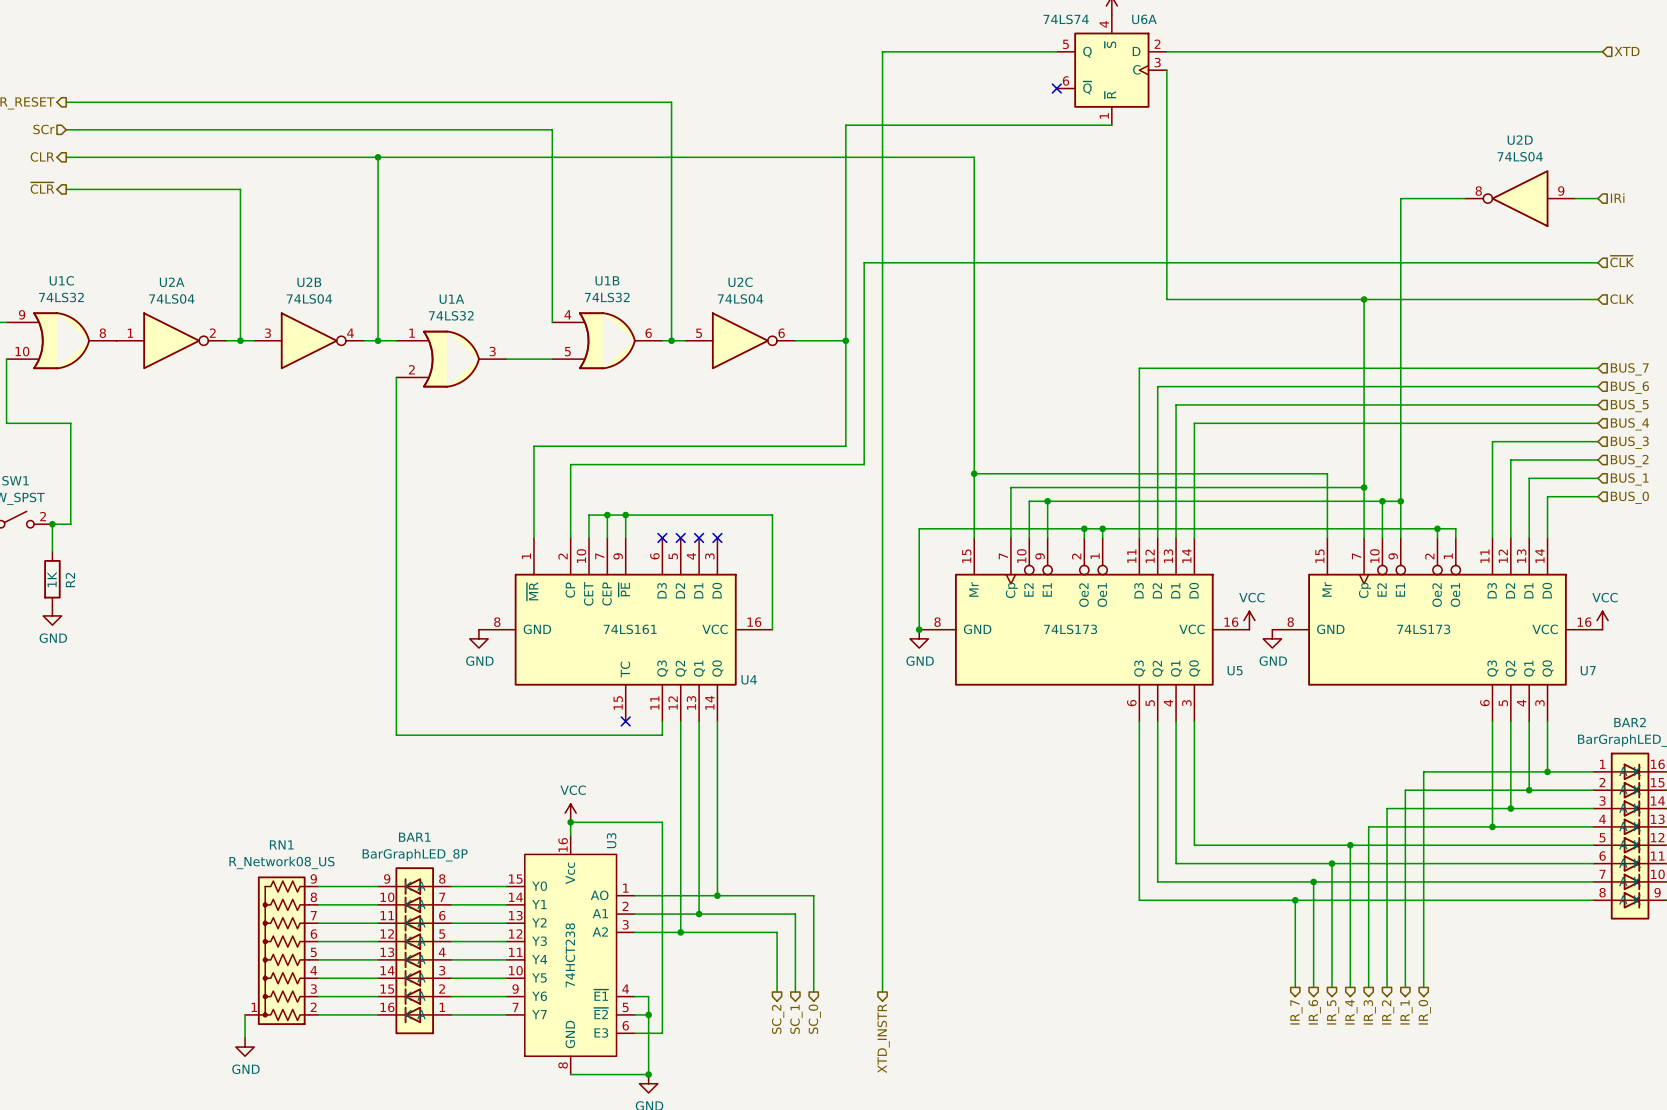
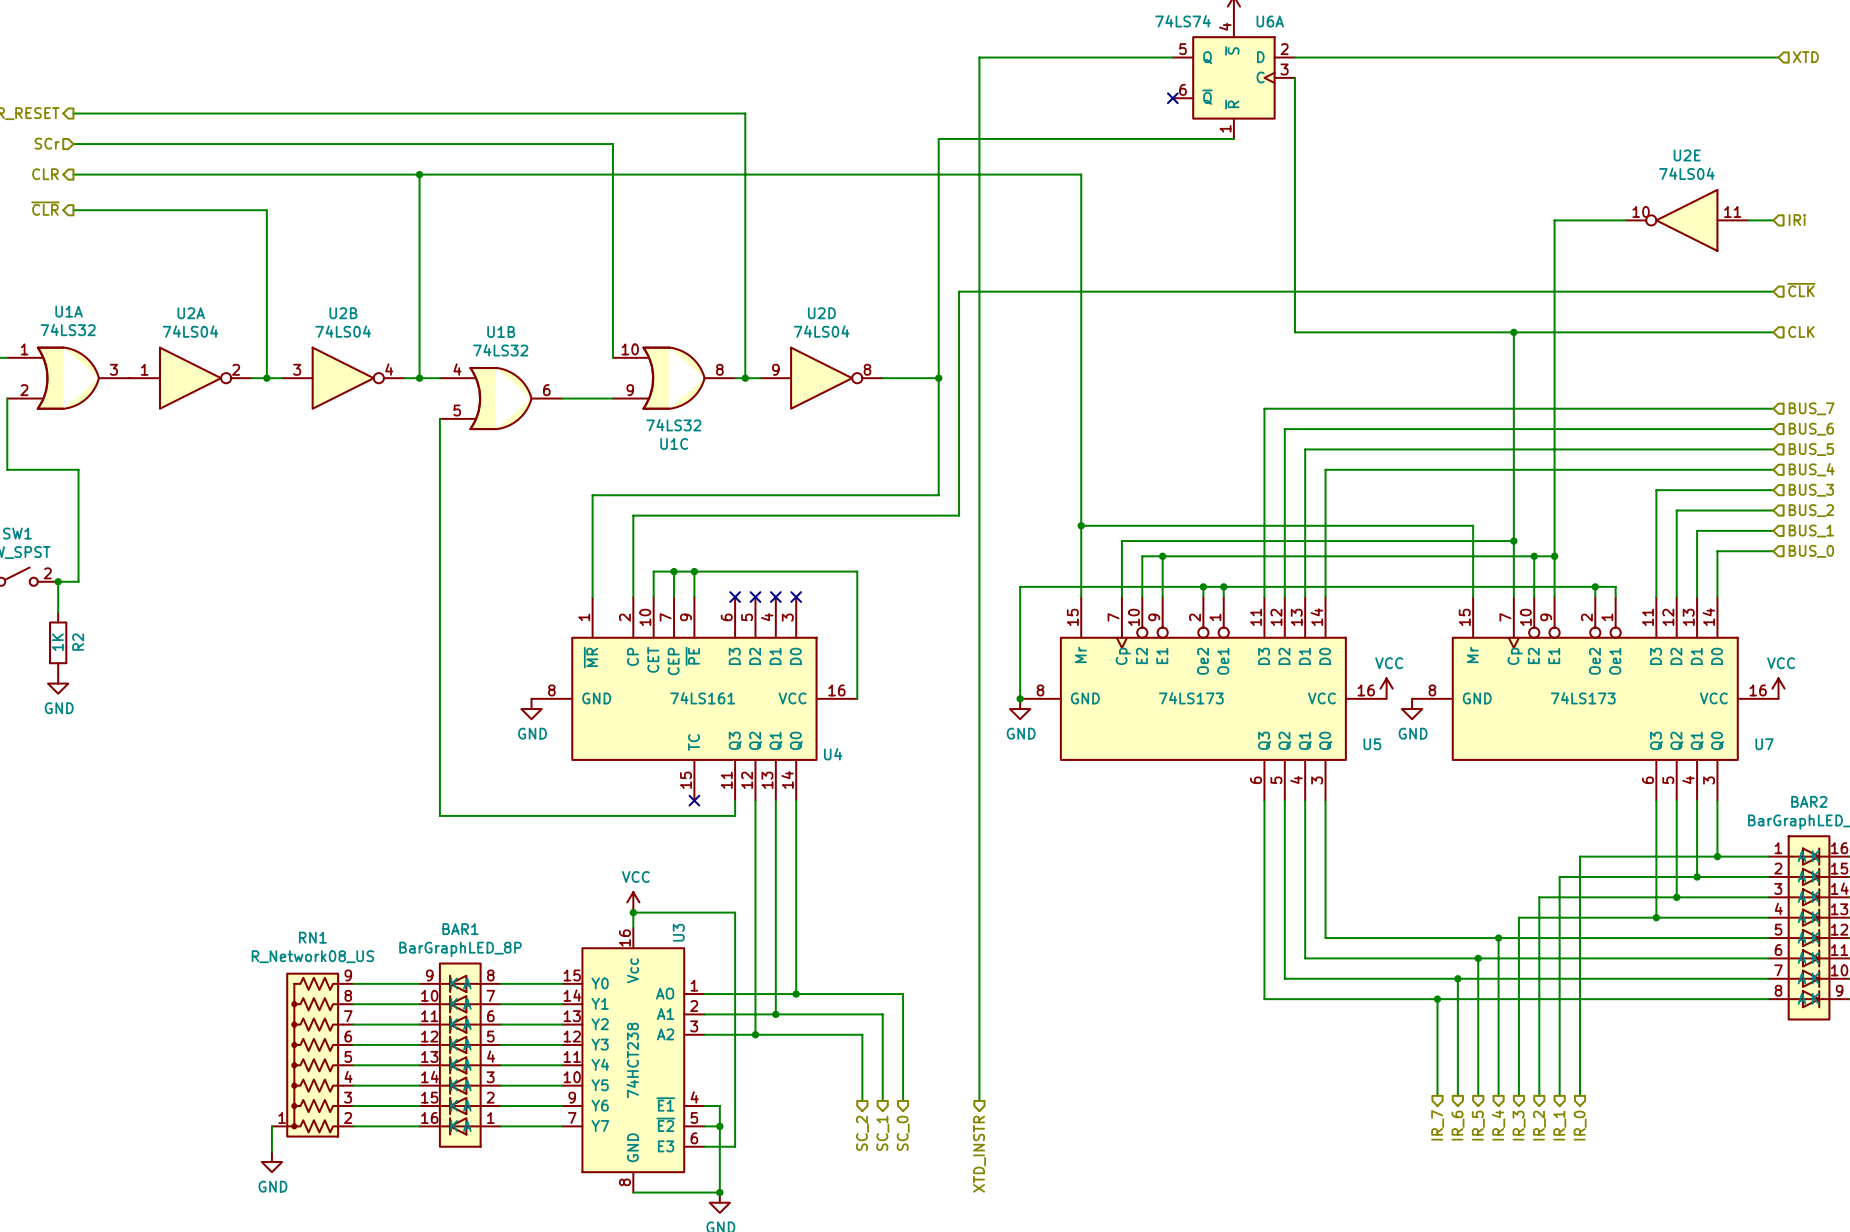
U2D rotation: 0° (1520, 198) -> 180° (821, 378)
U2D position: (1520, 198) -> (821, 378)
U2E: none -> 74LS04 (1686, 220)
U1C flip: as is (61, 340) -> up-down (674, 378)
U1C position: (61, 340) -> (674, 378)
U1B position: (607, 340) -> (500, 398)
U2C: 74LS04 (740, 340) -> none
U1A position: (451, 359) -> (68, 378)

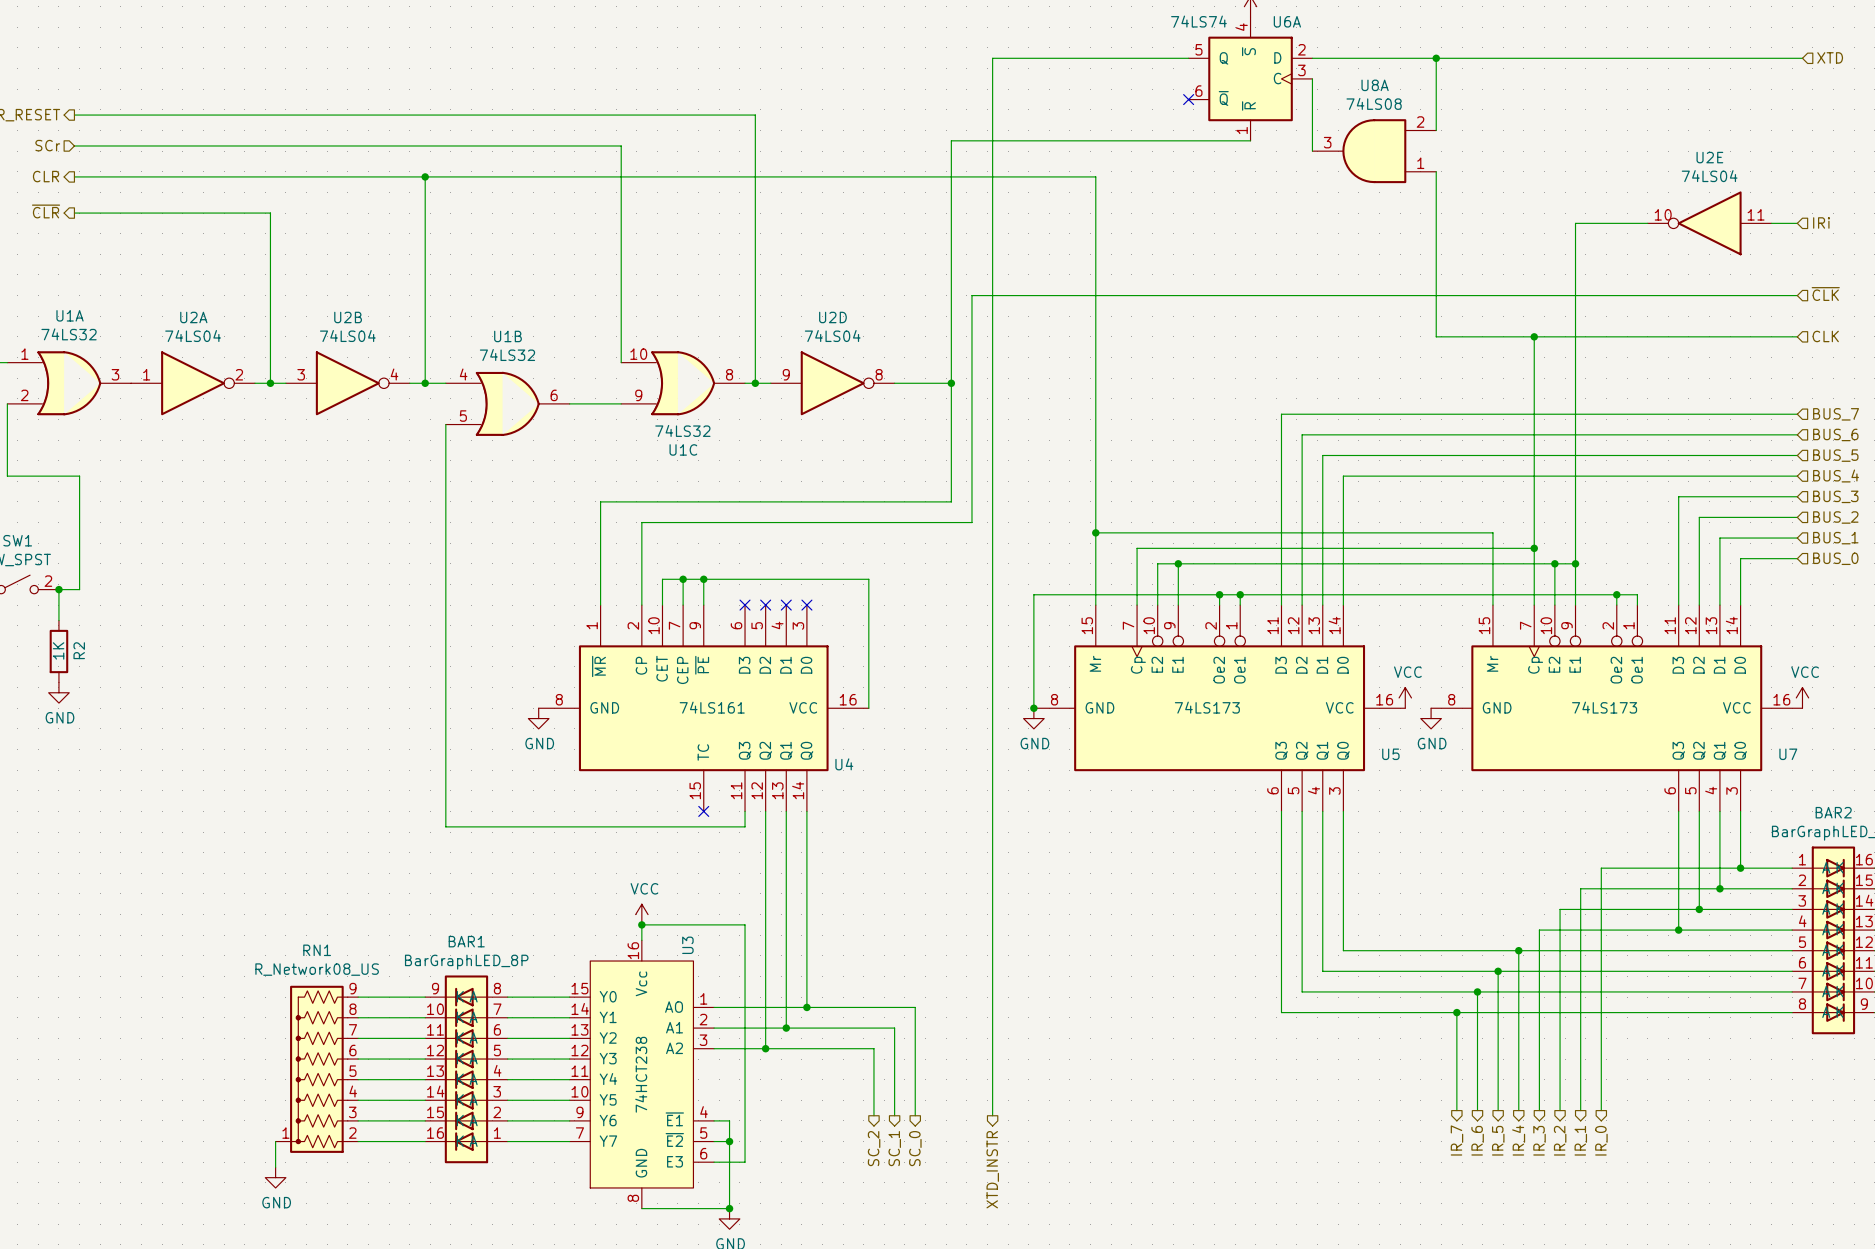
wire: none -> (1436, 58) (1436, 130)
junction: none -> (1436, 58)
wire: (1294, 149) (1294, 332) (1417, 332) -> (1436, 171) (1436, 336)
U8A: none -> 74LS08 (1374, 151)

